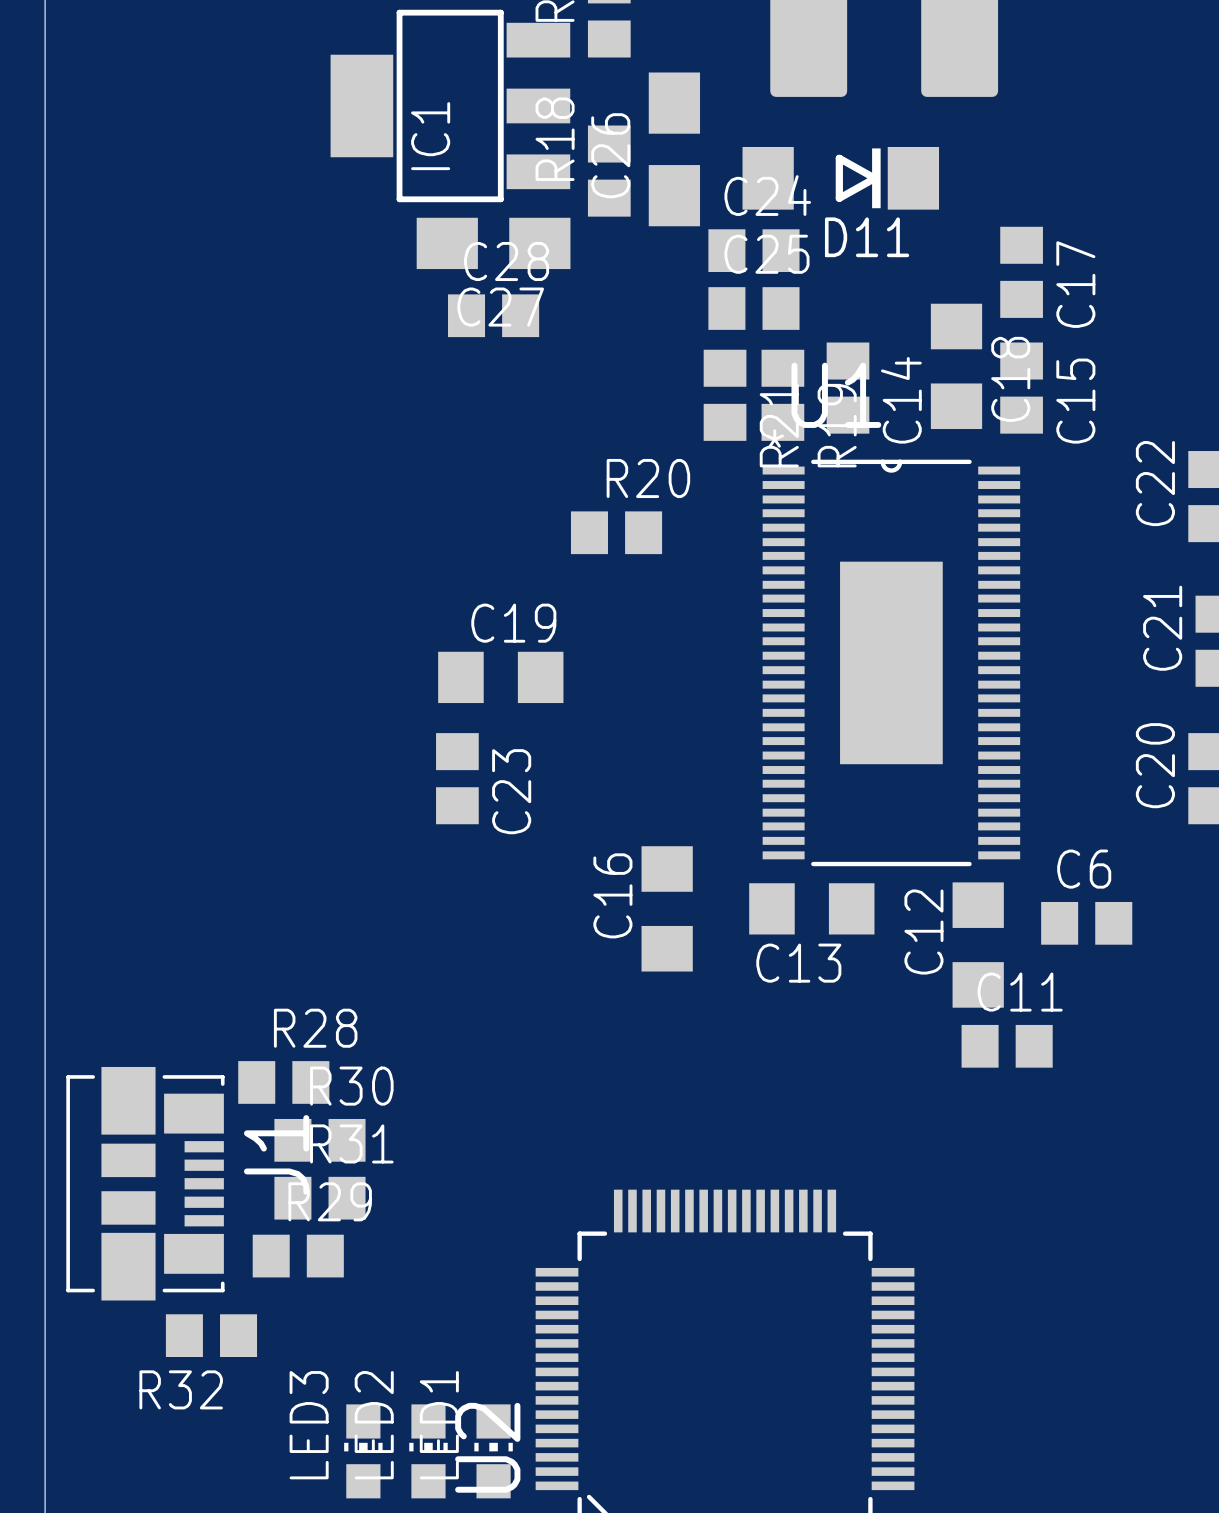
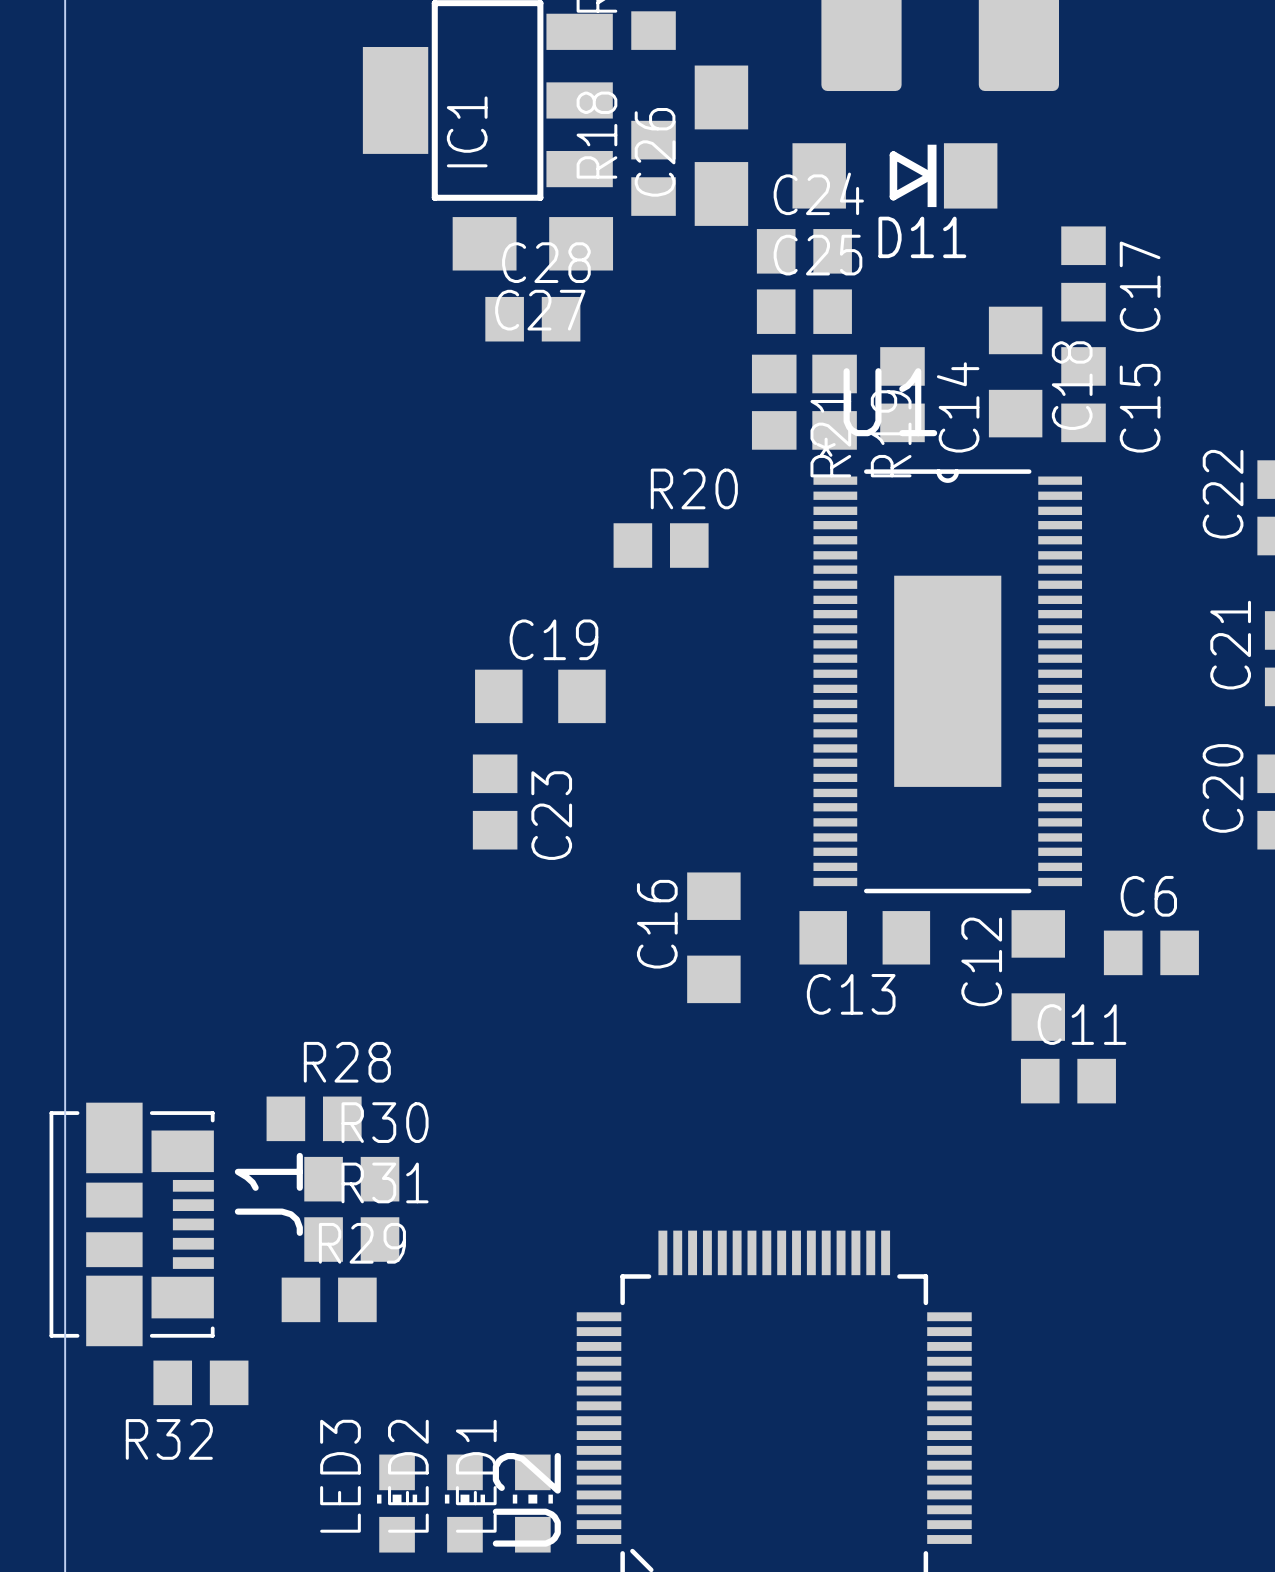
J1 position: (145, 1183) -> (132, 1224)
R32 position: (211, 1335) -> (200, 1382)

